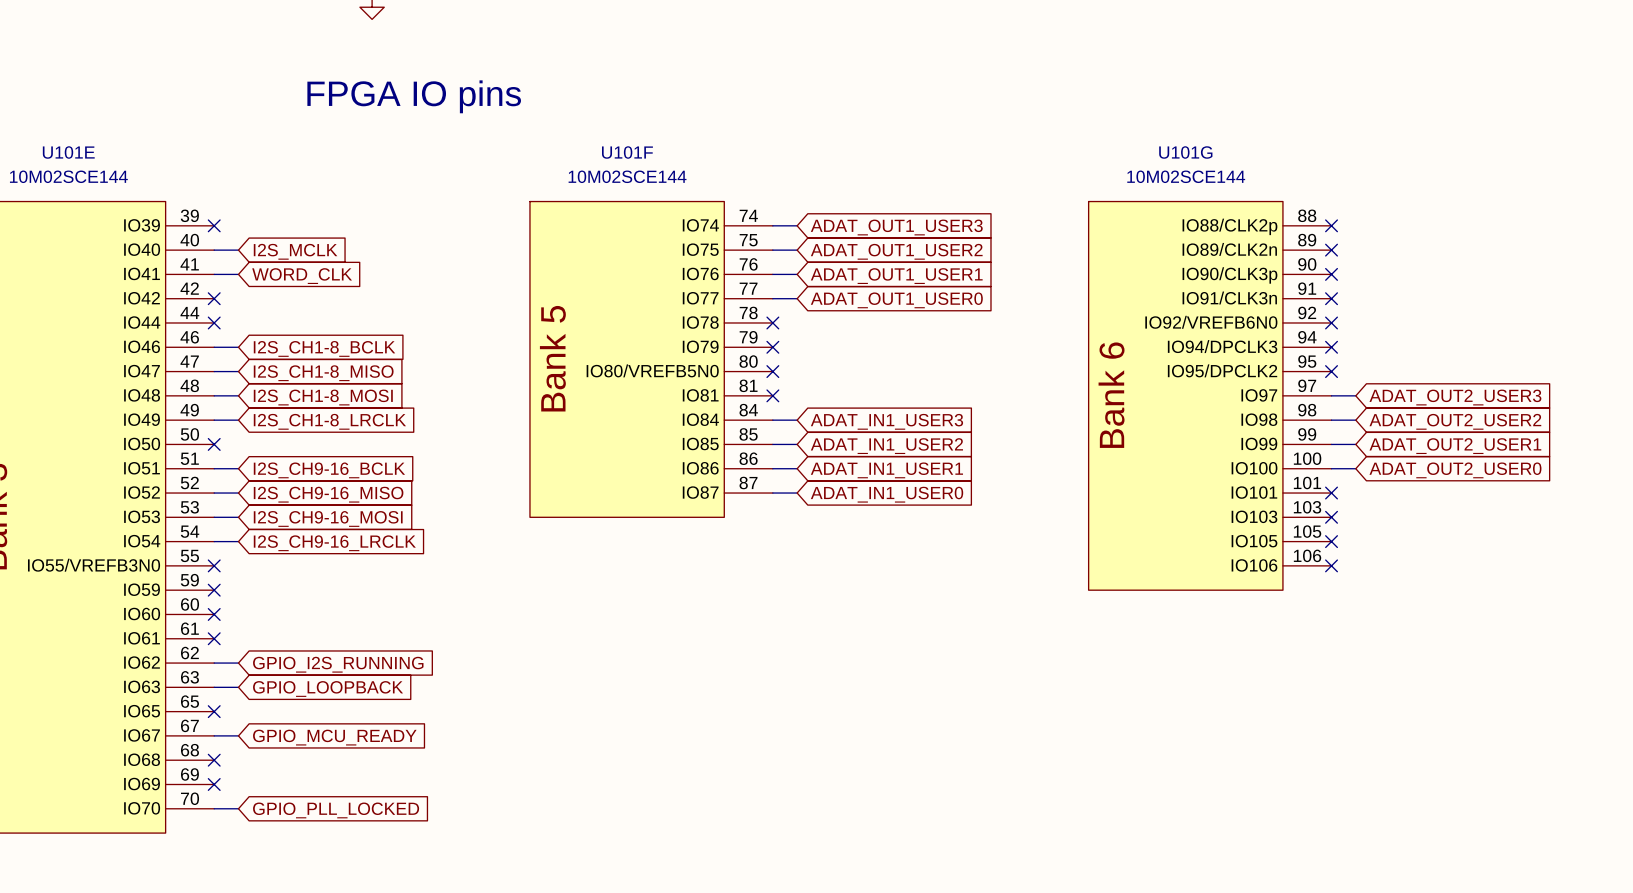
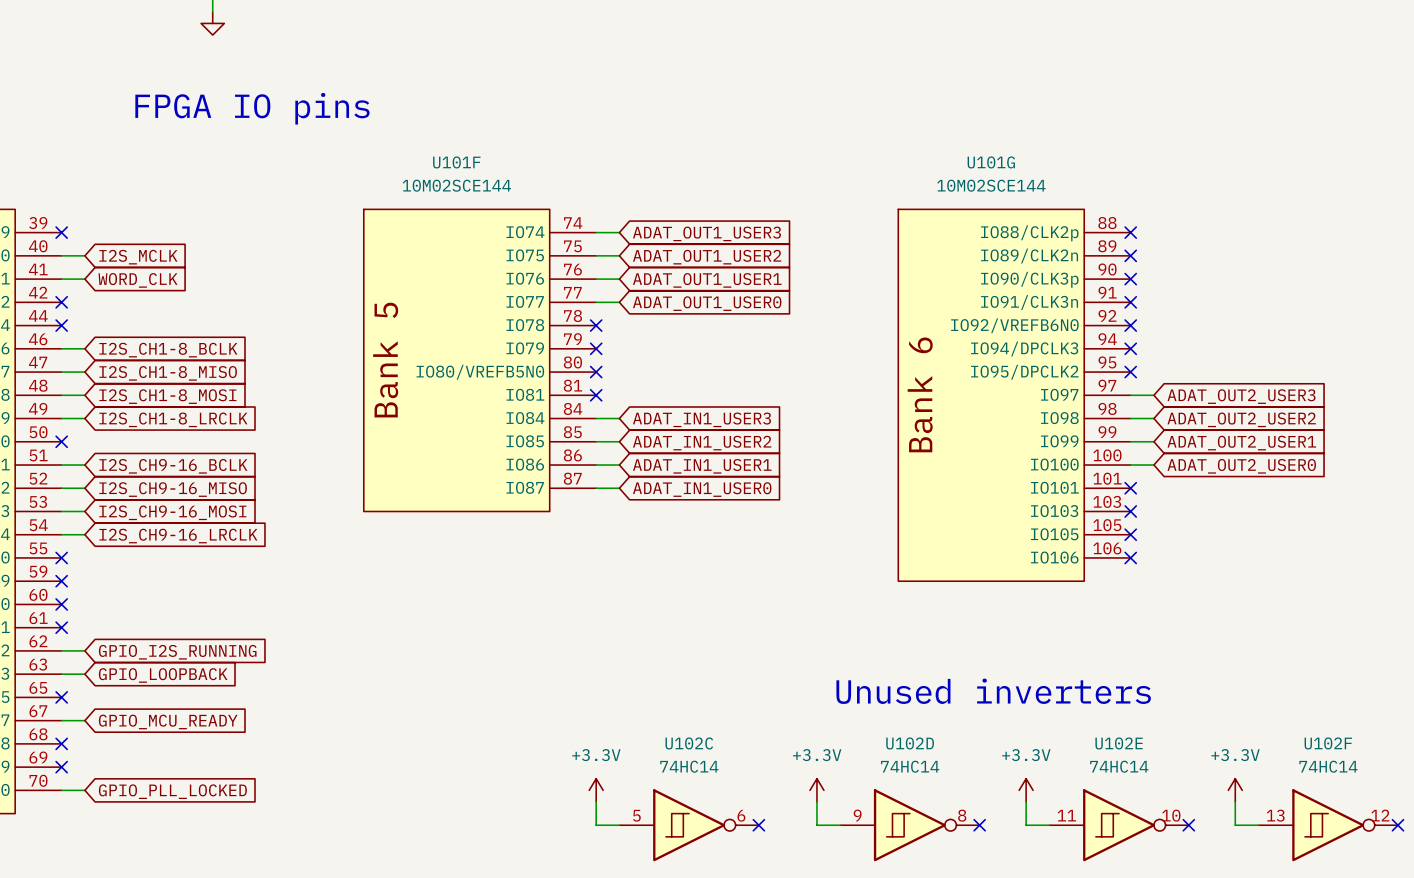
text: none -> Unused inverters (993, 691)
power symbol: none -> +3.3V (596, 790)
power symbol: none -> +3.3V (816, 790)
power symbol: none -> +3.3V (1026, 790)
power symbol: none -> +3.3V (1235, 790)
wire: none -> (596, 801) (596, 825) (619, 825)
wire: none -> (816, 801) (816, 825) (840, 825)
wire: none -> (1026, 801) (1026, 825) (1049, 825)
wire: none -> (1235, 801) (1235, 825) (1258, 825)
U102C: none -> 74HC14 (689, 825)
no-connect mark: none -> (758, 825)
U102D: none -> 74HC14 (909, 825)
no-connect mark: none -> (979, 825)
U102E: none -> 74HC14 (1119, 825)
no-connect mark: none -> (1188, 825)
U102F: none -> 74HC14 (1328, 825)
no-connect mark: none -> (1397, 825)

